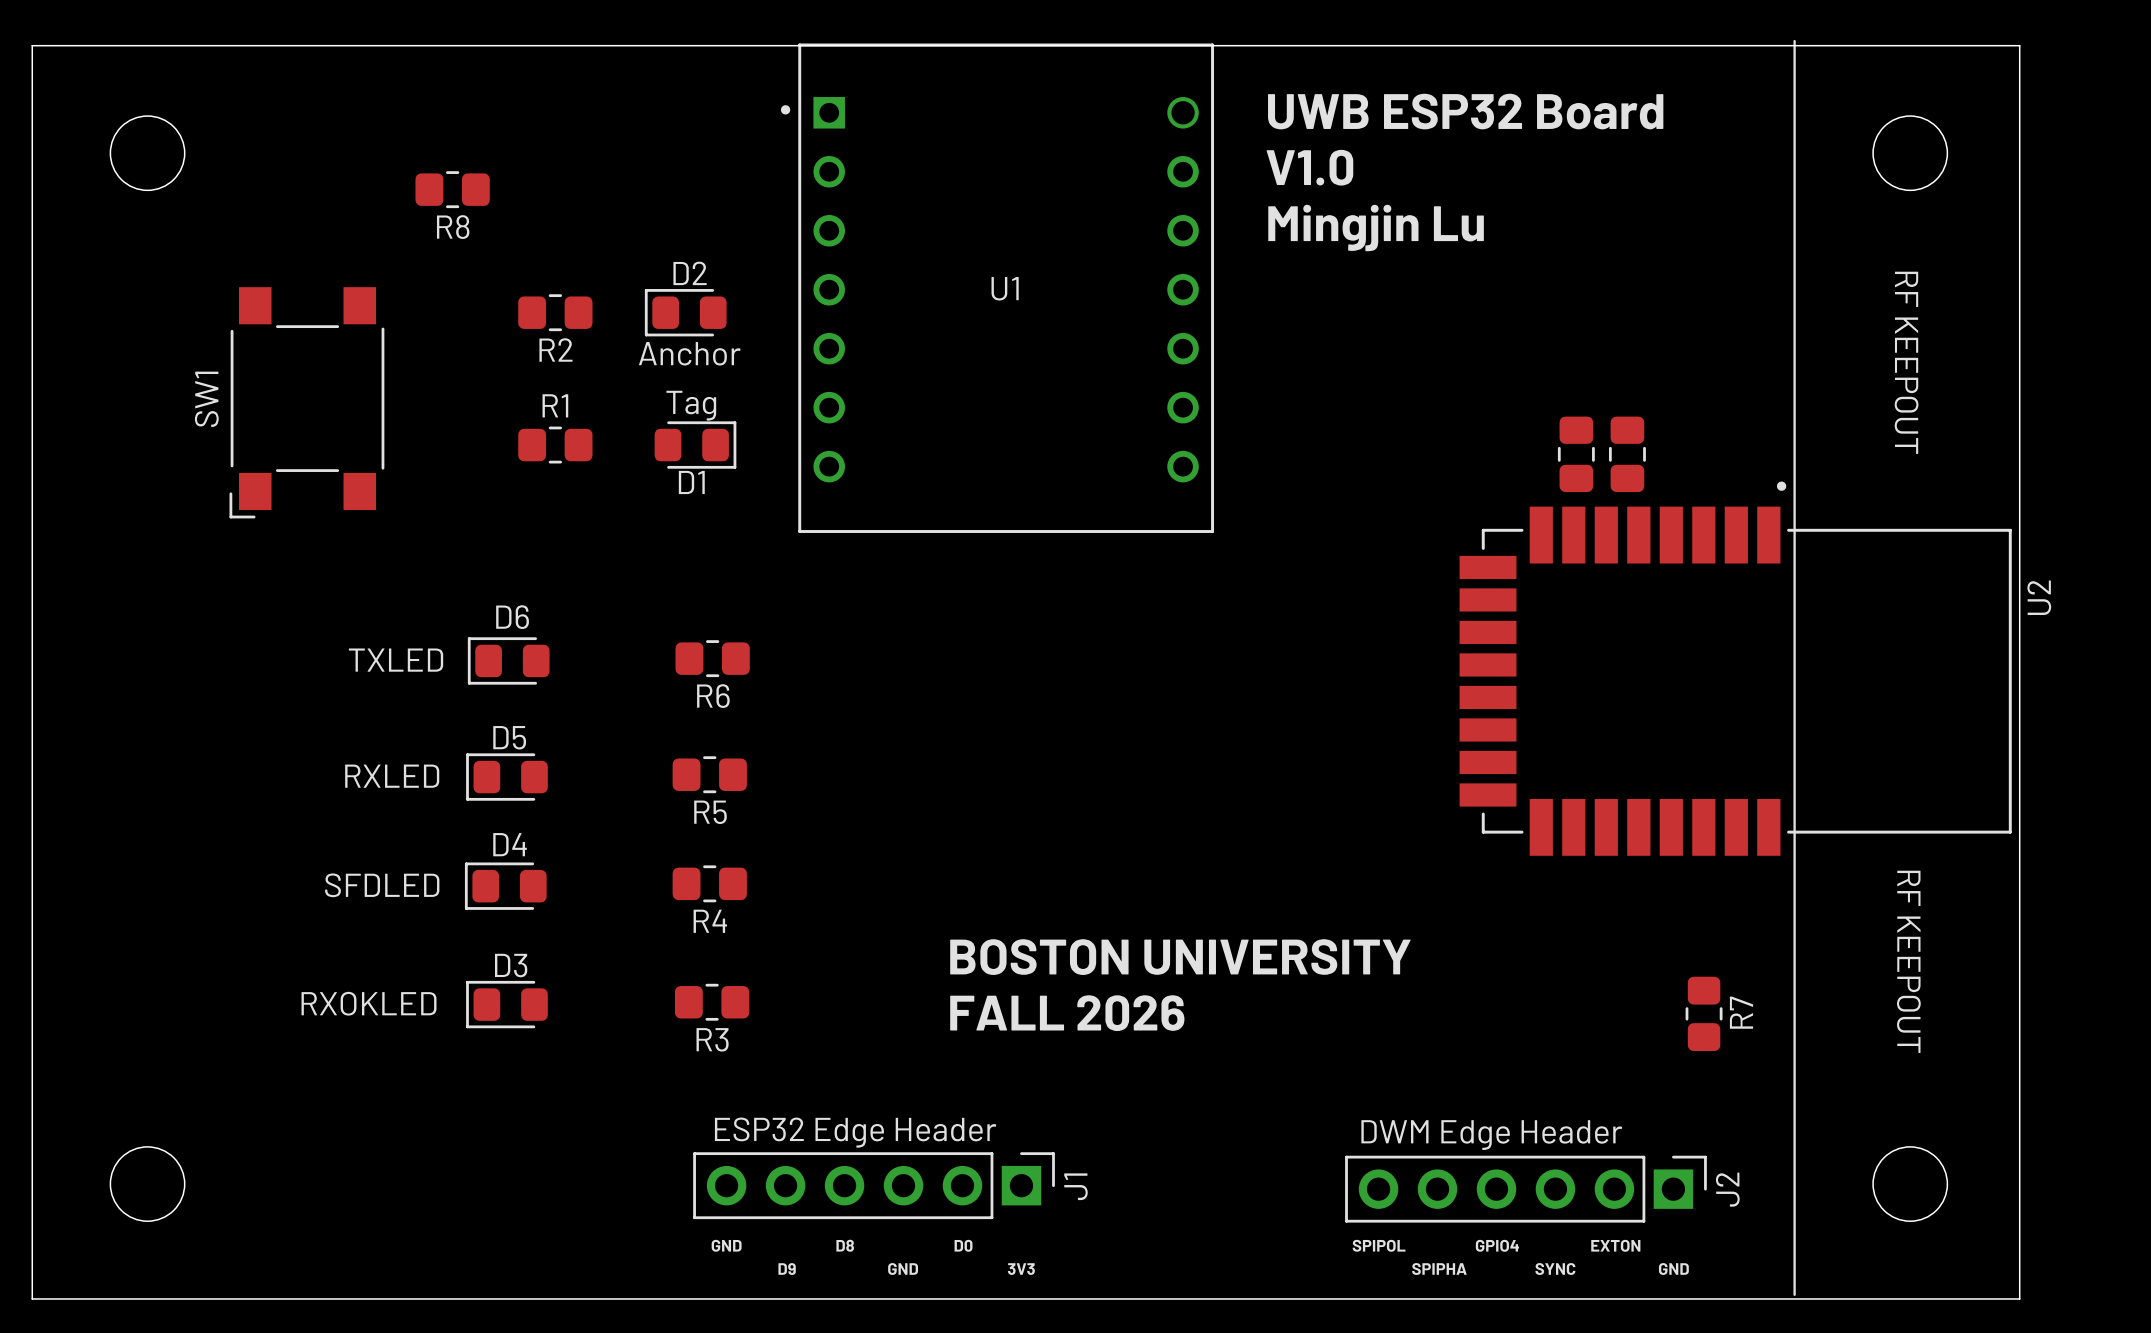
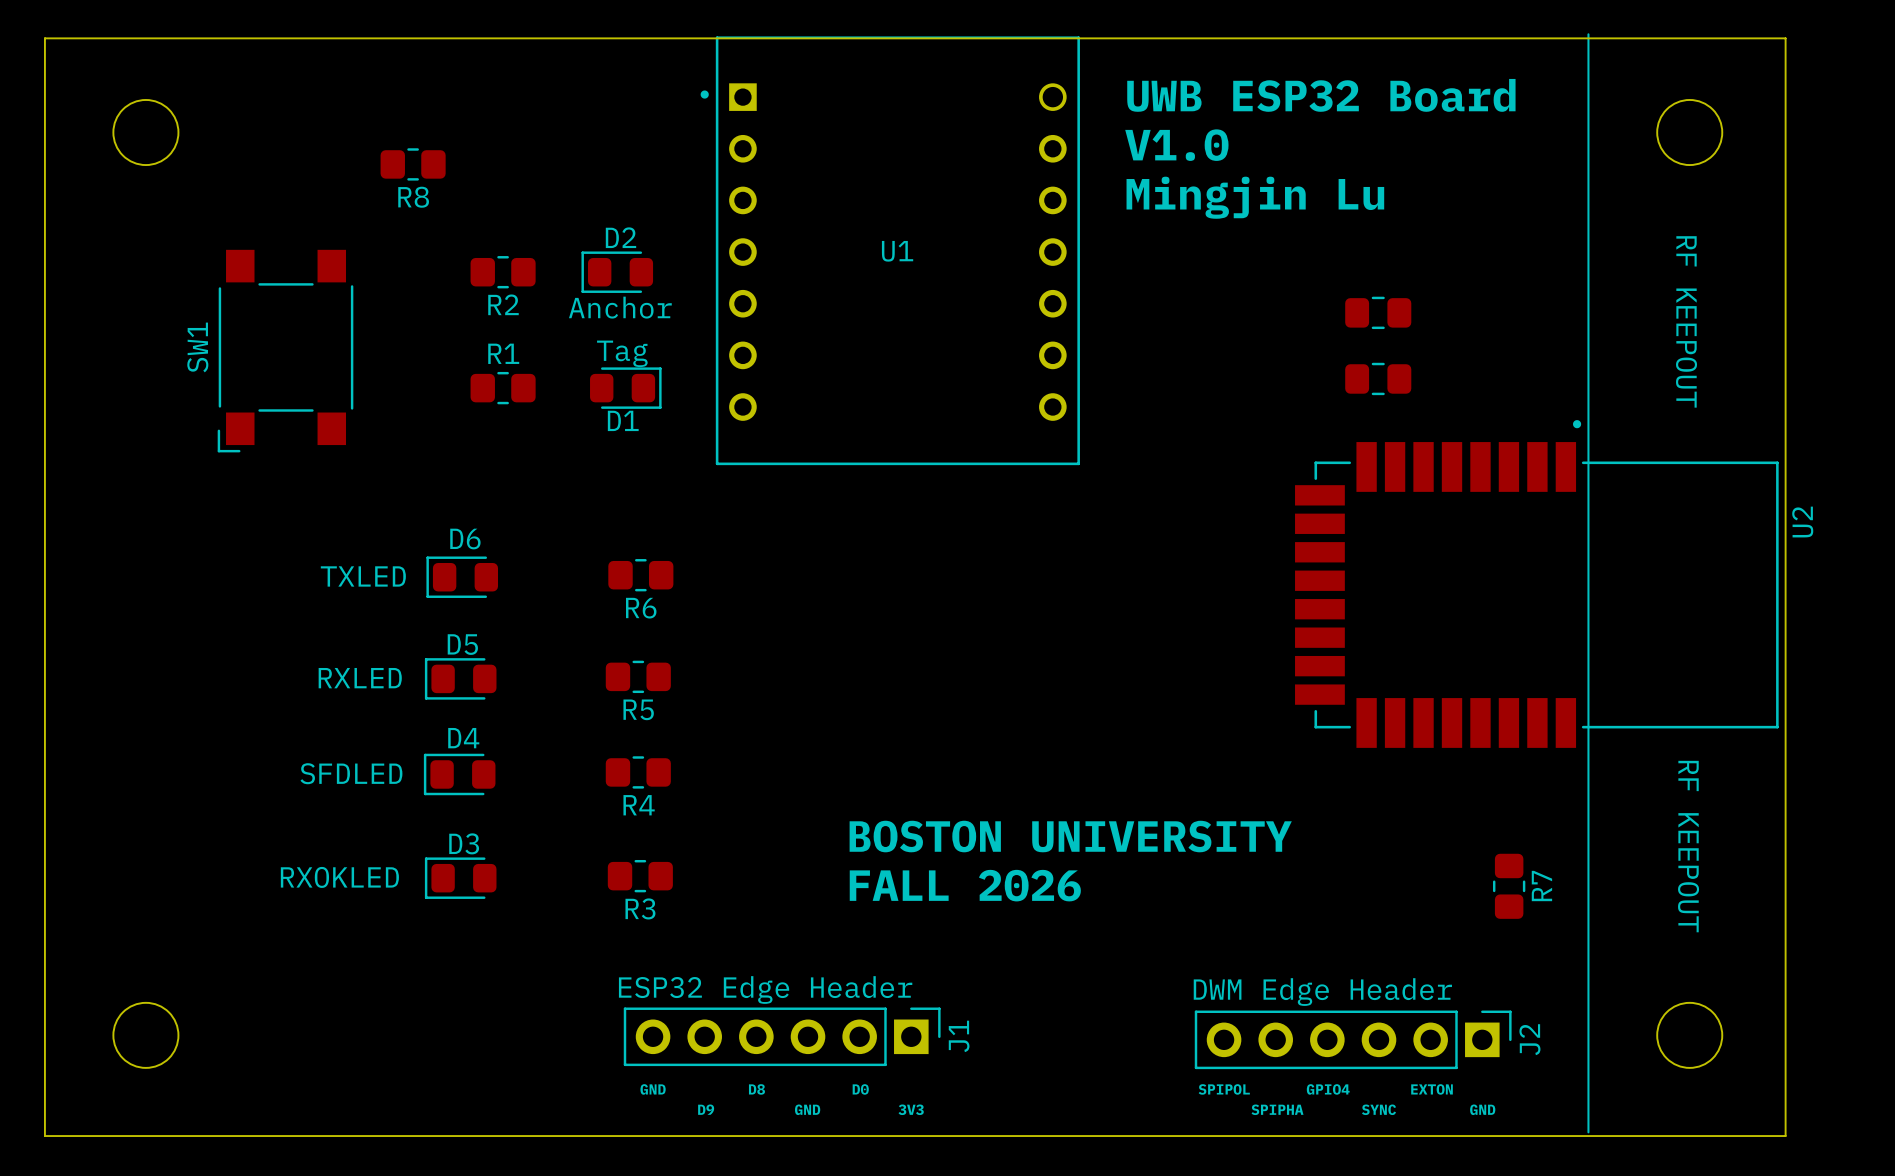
part: none -> (1378, 312)
part rotation: 0° (1576, 454) -> 90° clockwise (1378, 378)
part: (1627, 454) -> none

